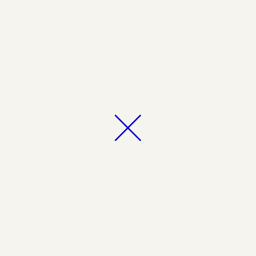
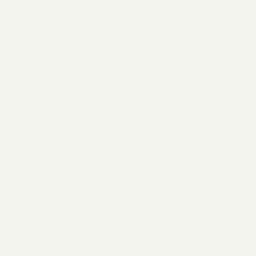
no-connect mark: (127, 127) -> none

